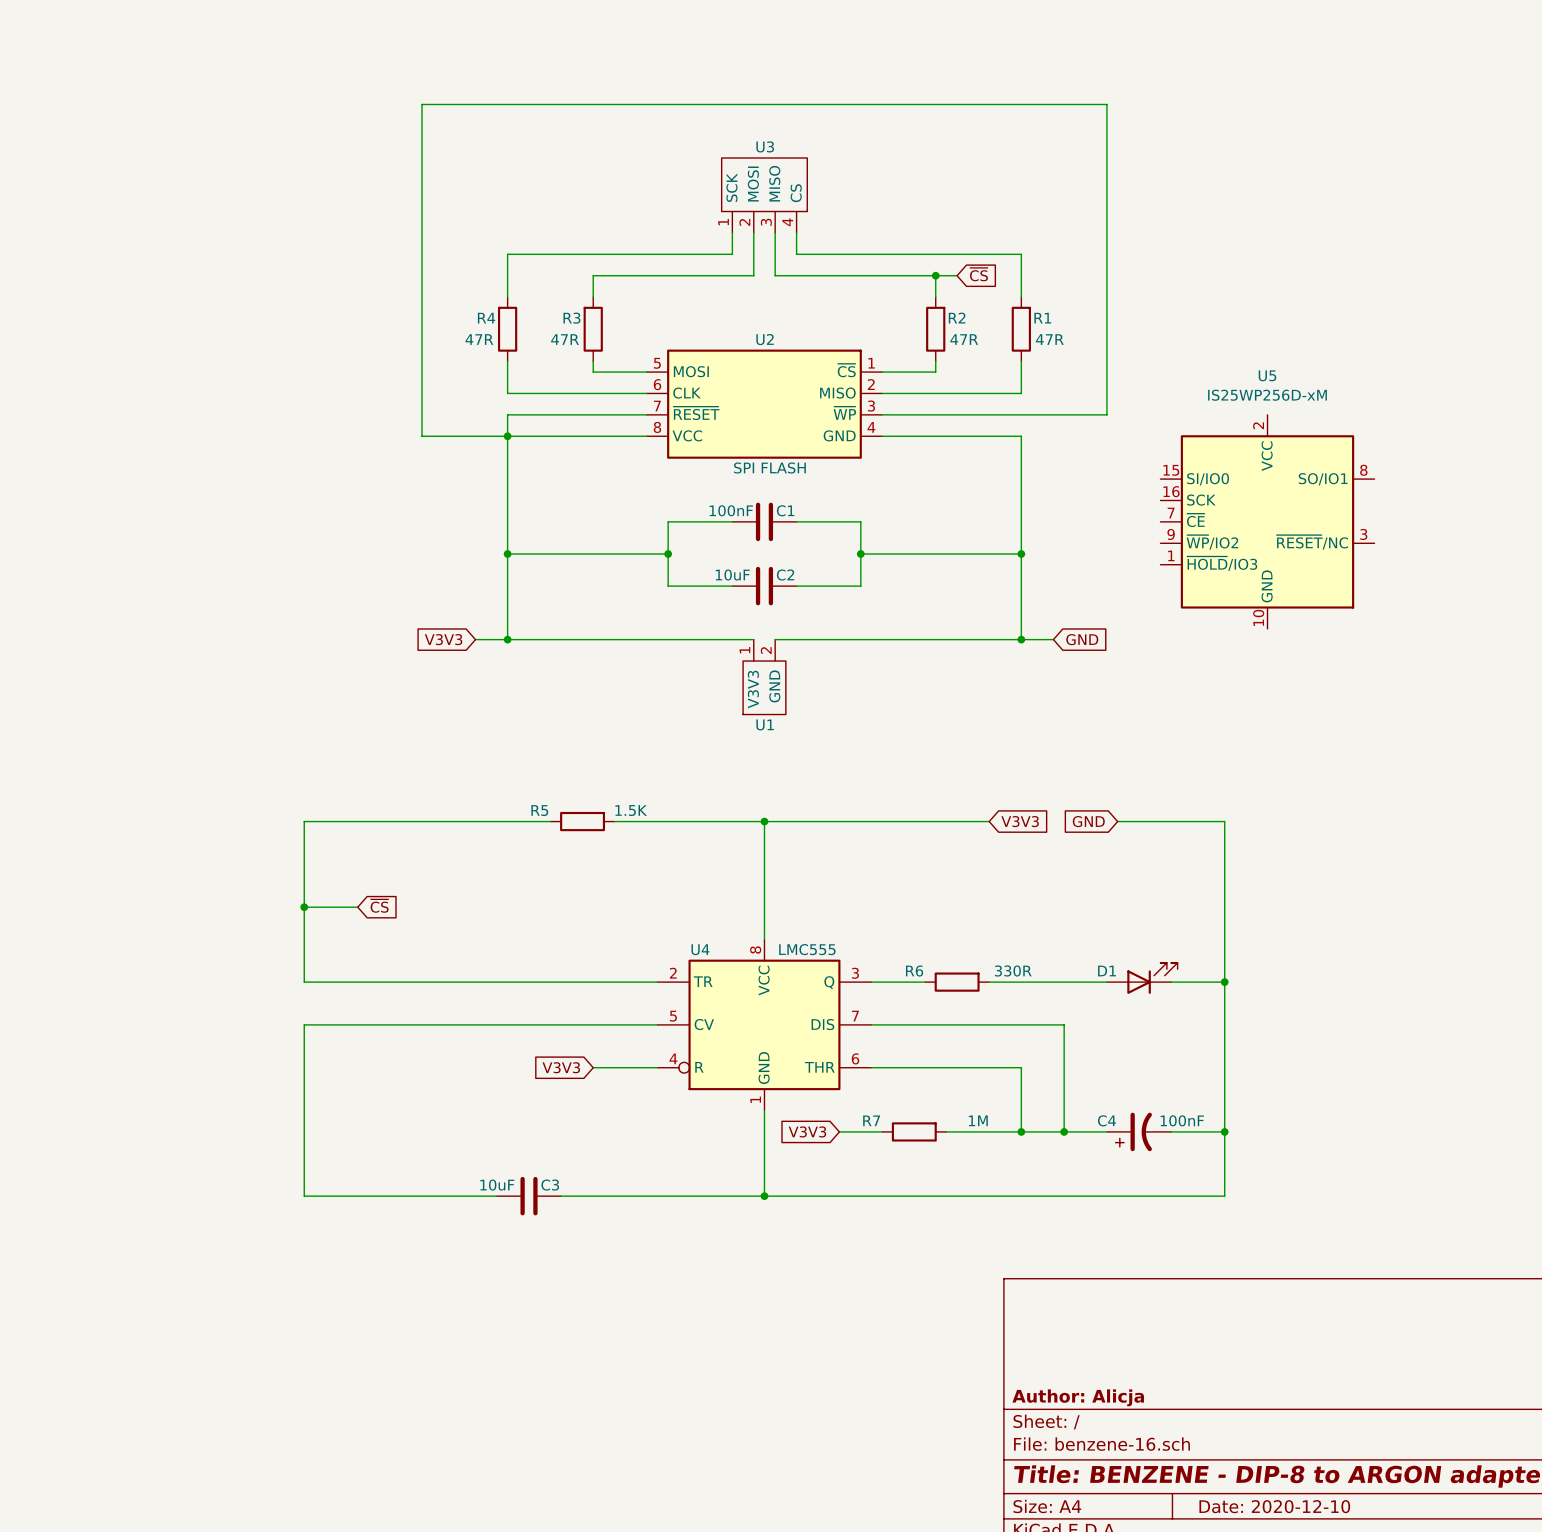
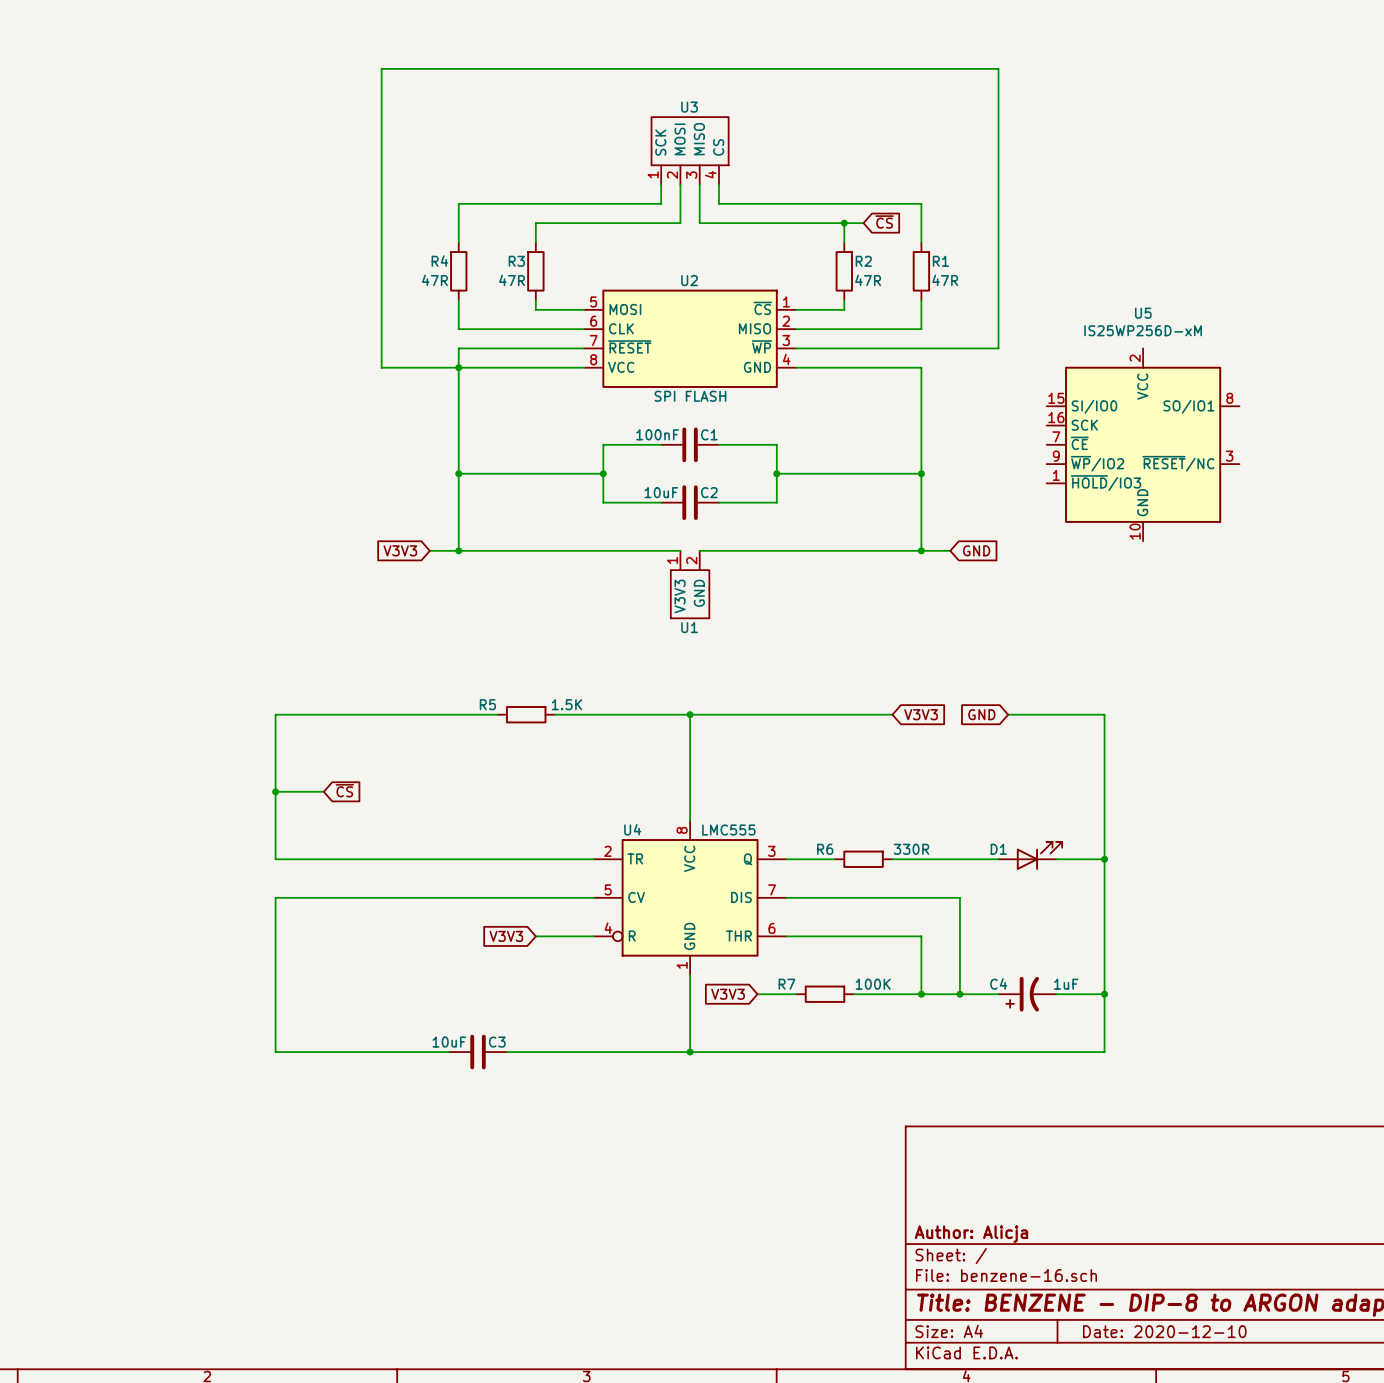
R7 value: 1M (978, 1120) -> 100K (873, 984)
C4 value: 100nF (1182, 1120) -> 1uF (1066, 984)

